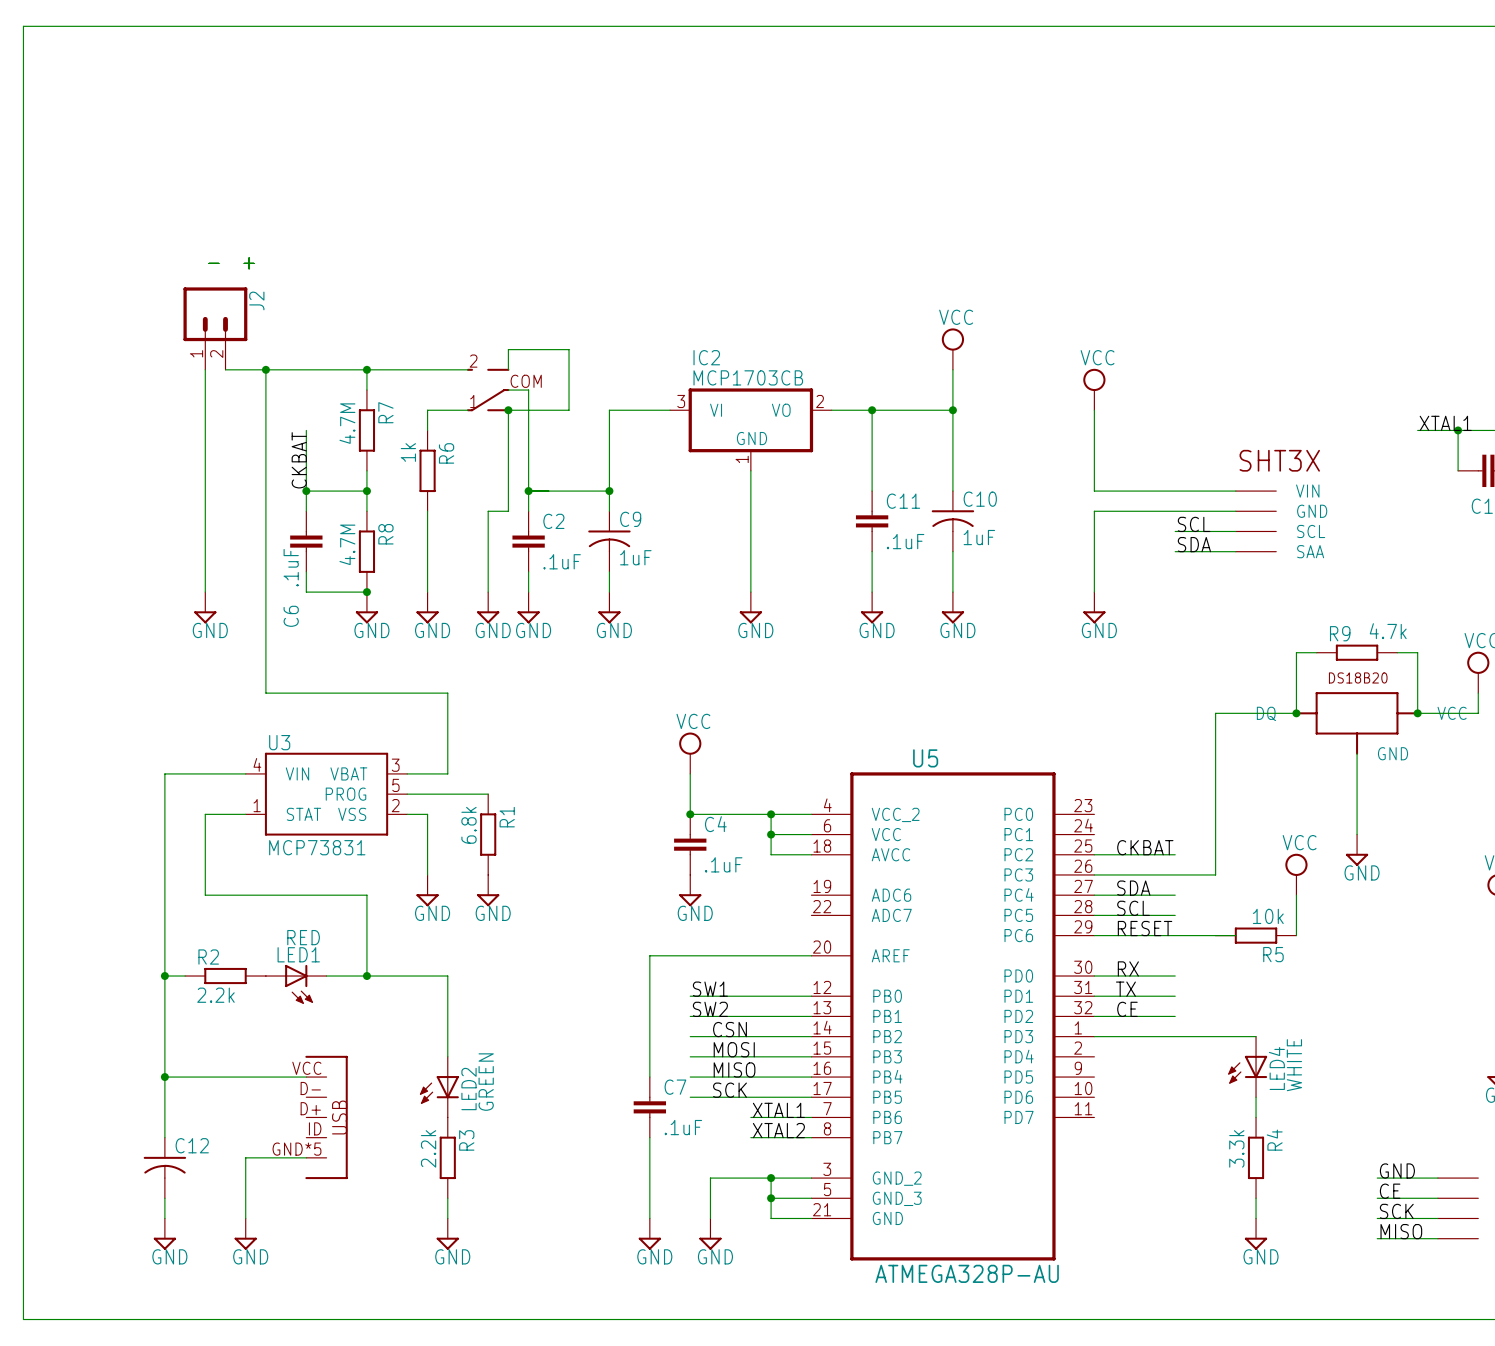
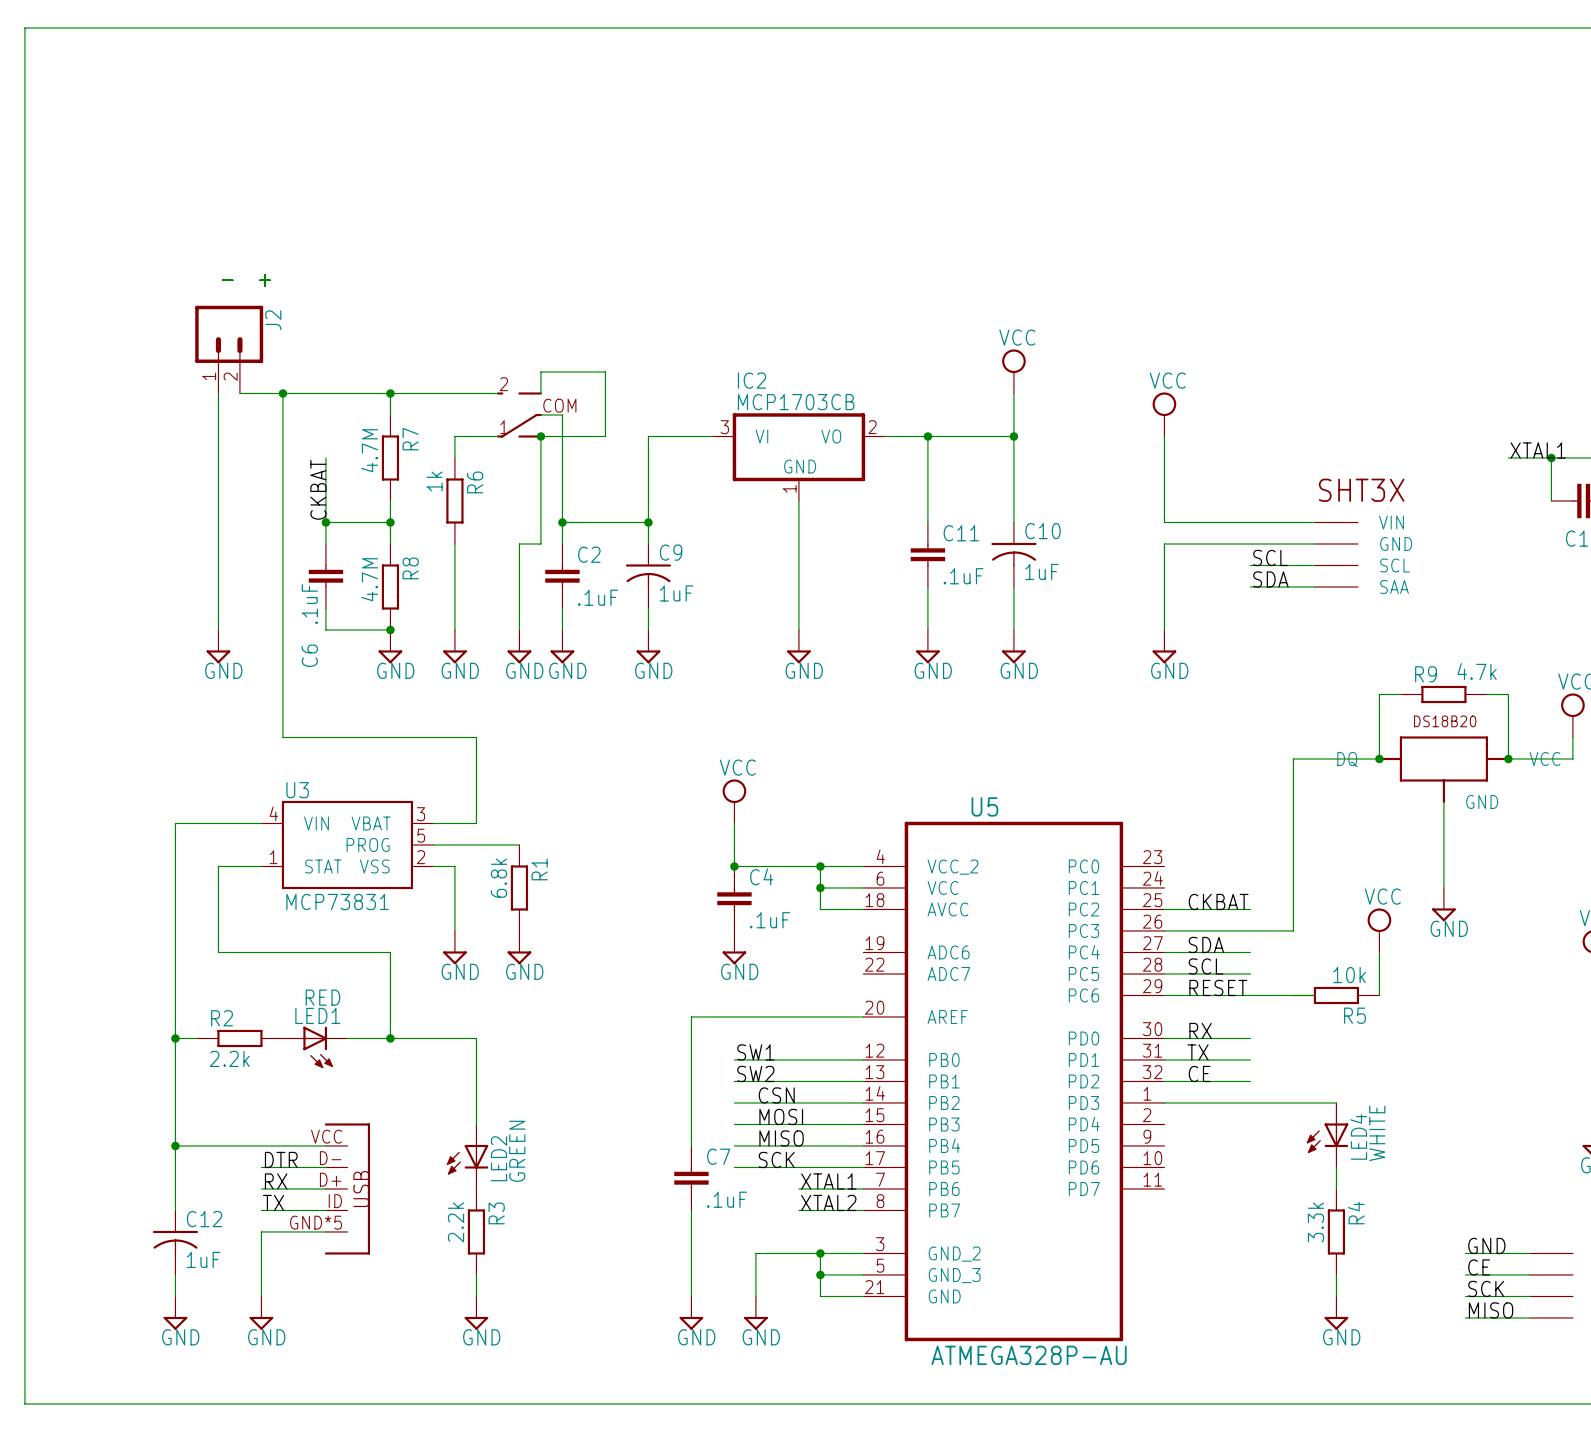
label: none -> DTR (281, 1159)
wire: none -> (261, 1167) (325, 1167)
label: none -> RX (276, 1181)
wire: none -> (261, 1188) (325, 1188)
label: none -> TX (273, 1202)
wire: none -> (261, 1210) (325, 1210)
C12 value: none -> 1uF (203, 1259)

